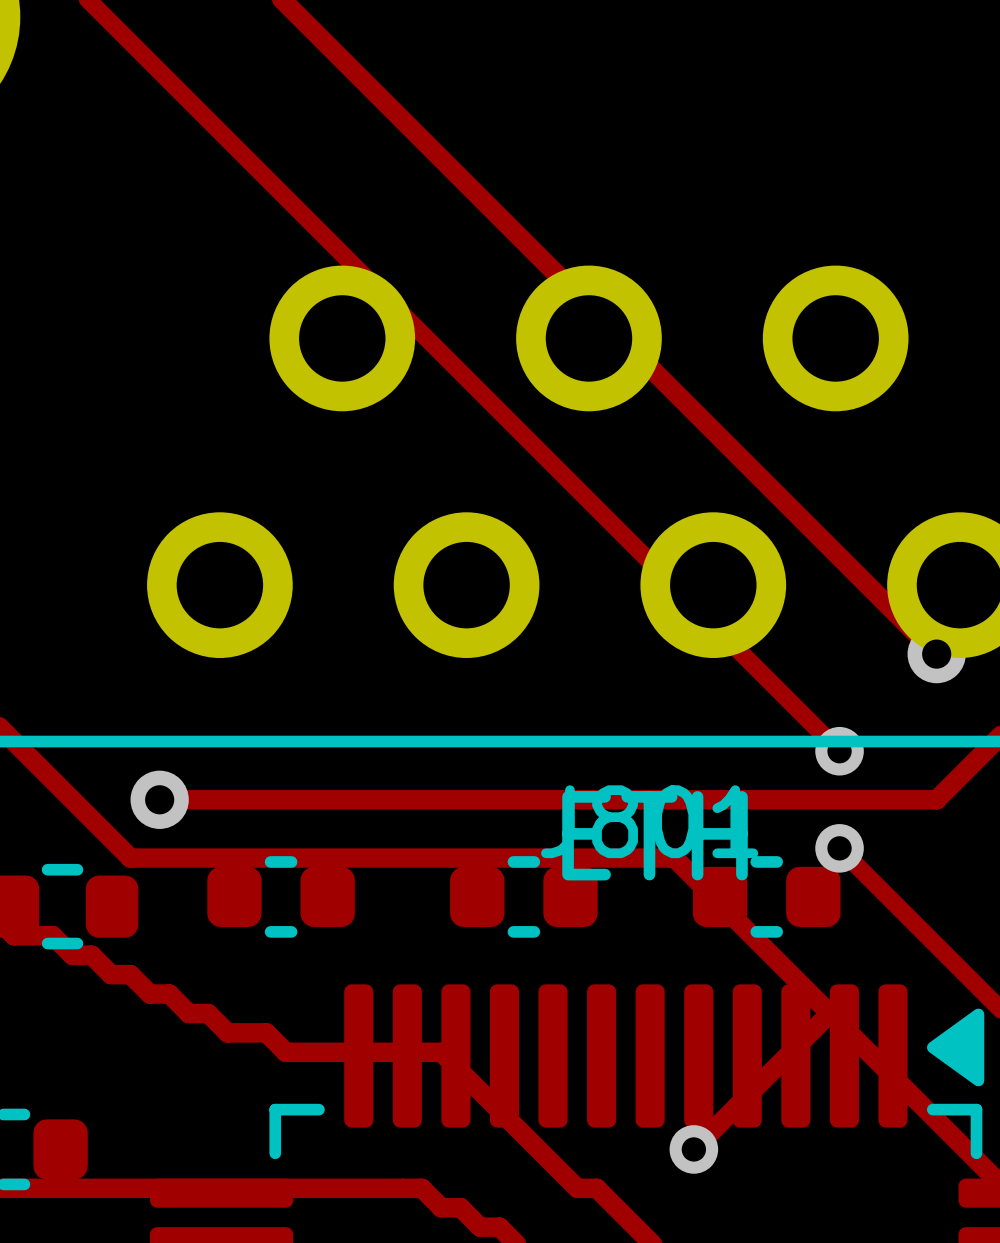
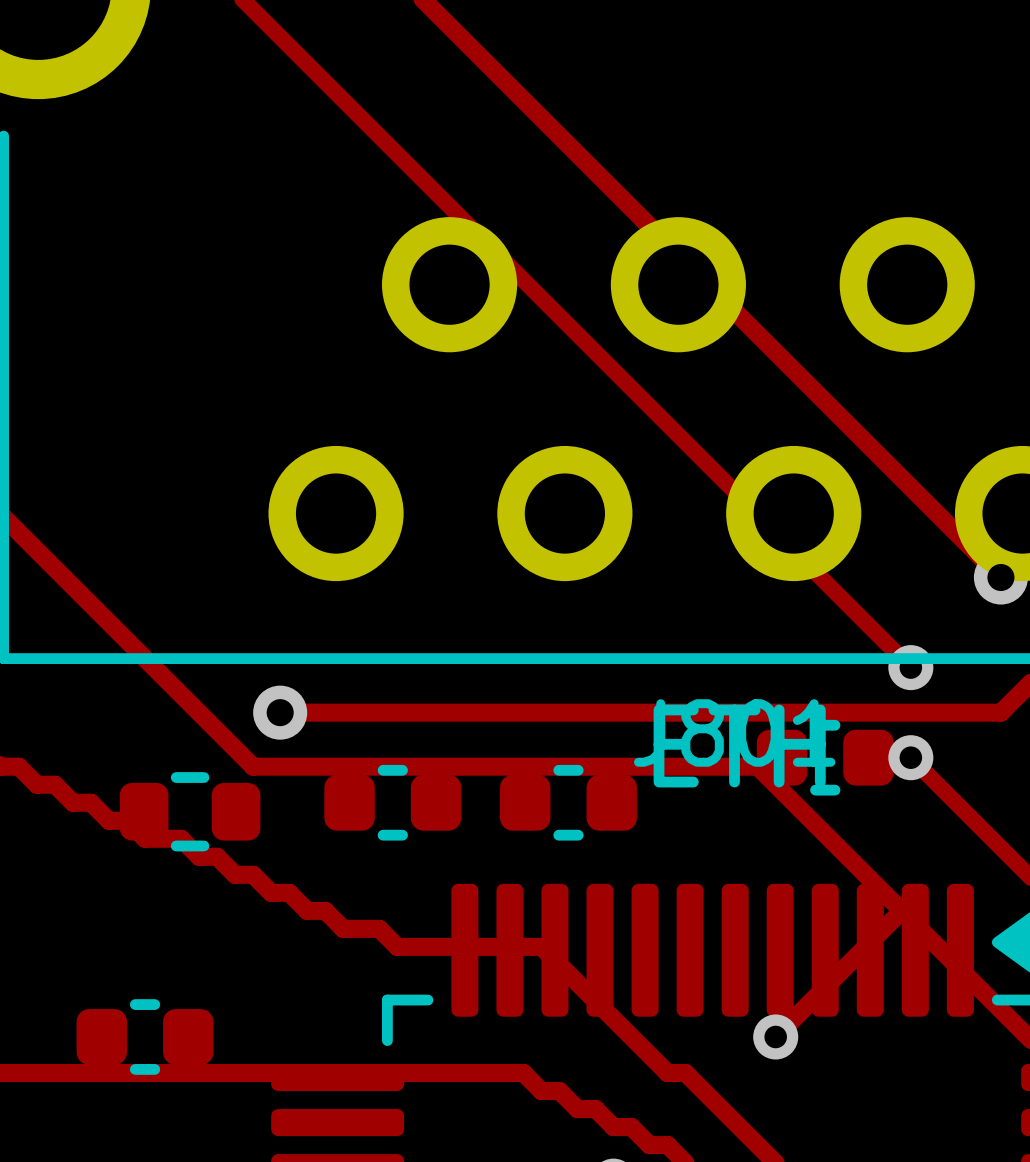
part position: (523, 896) -> (568, 802)
part position: (766, 896) -> (825, 757)

